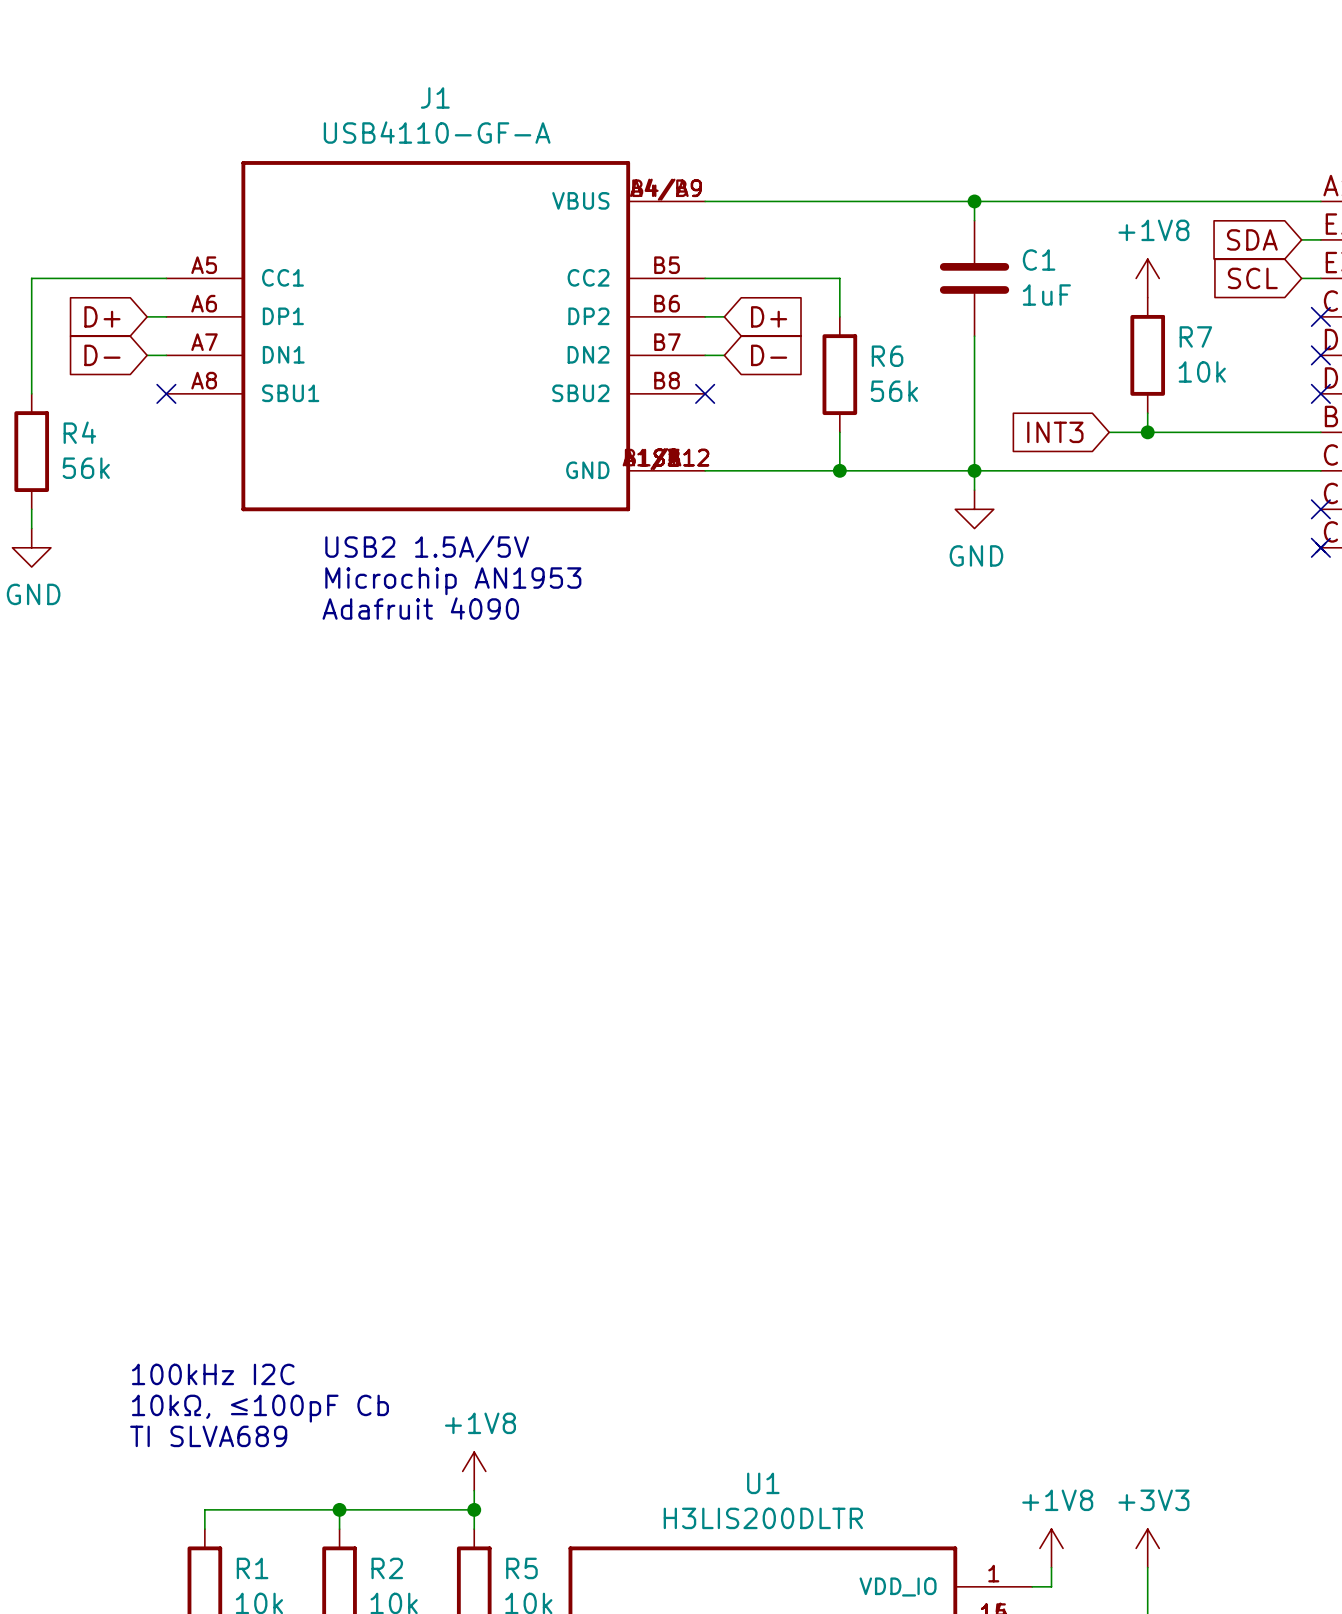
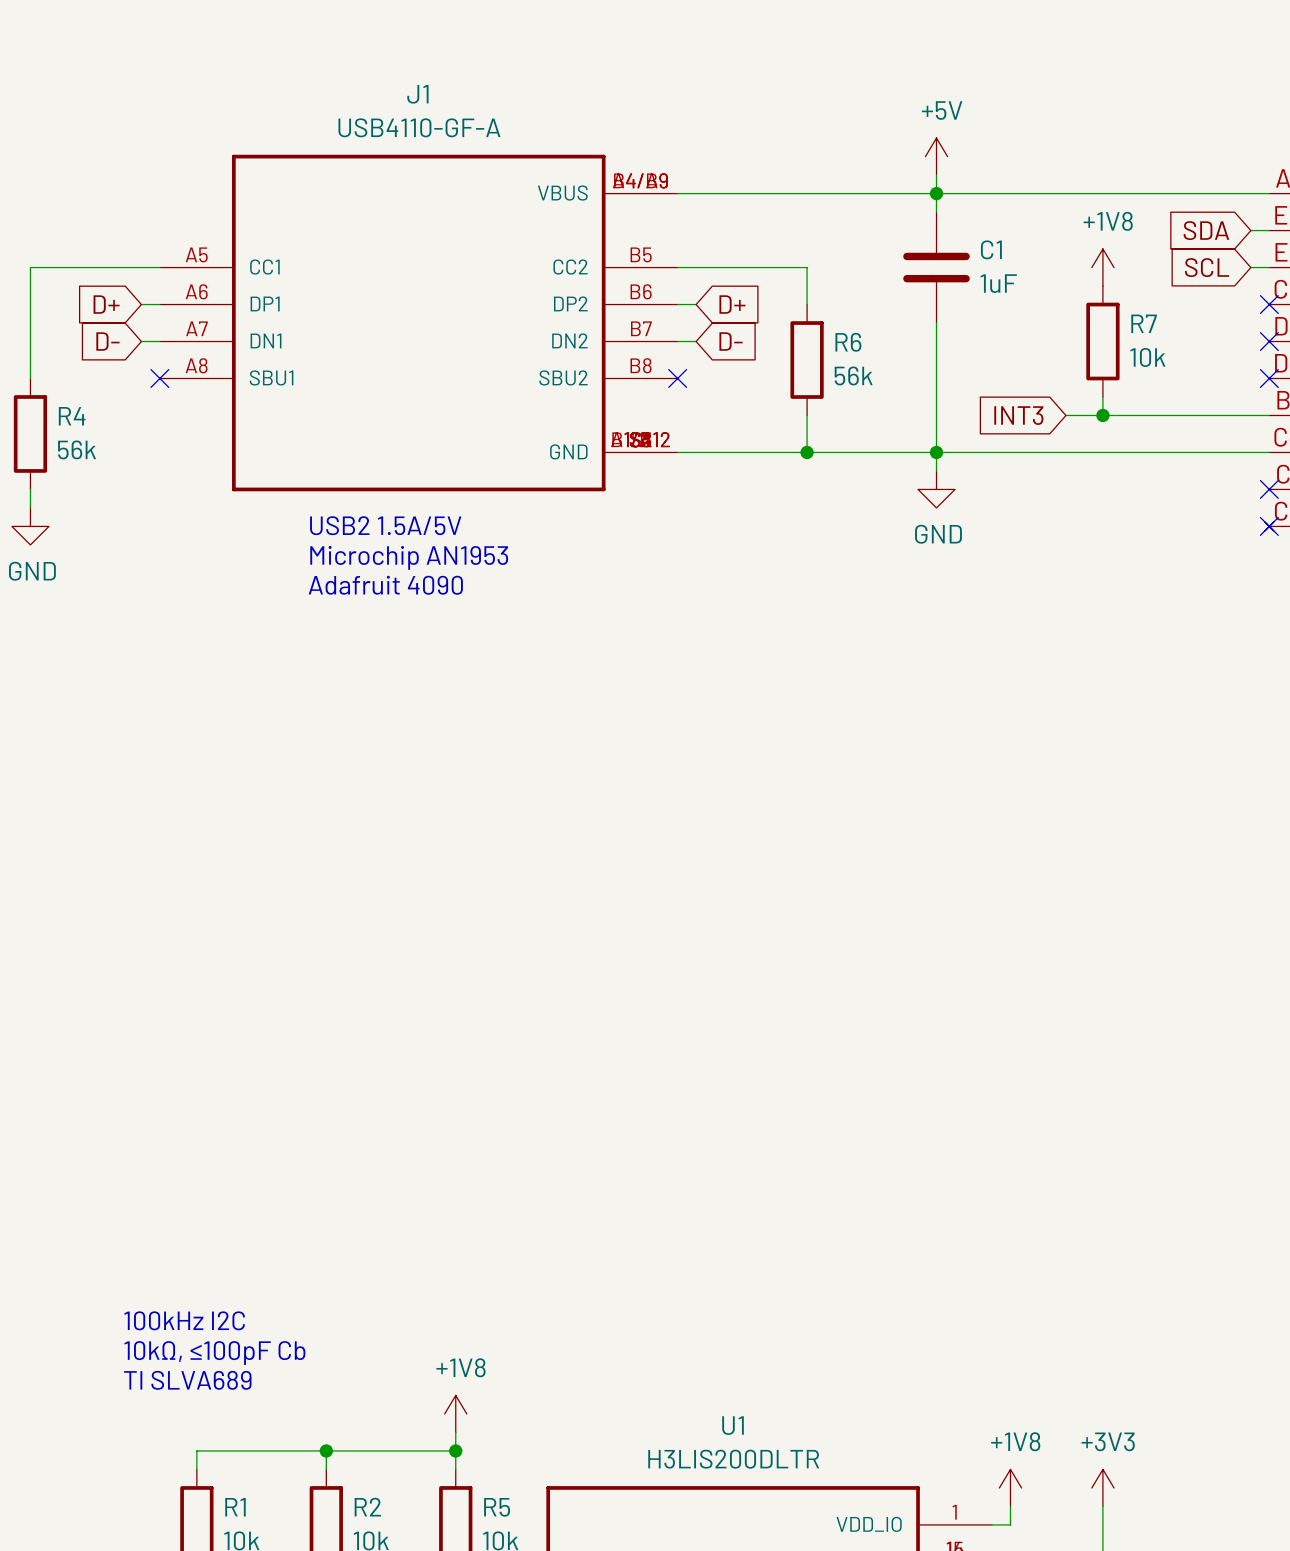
power symbol: none -> +5V (936, 156)
wire: none -> (936, 175) (936, 193)

